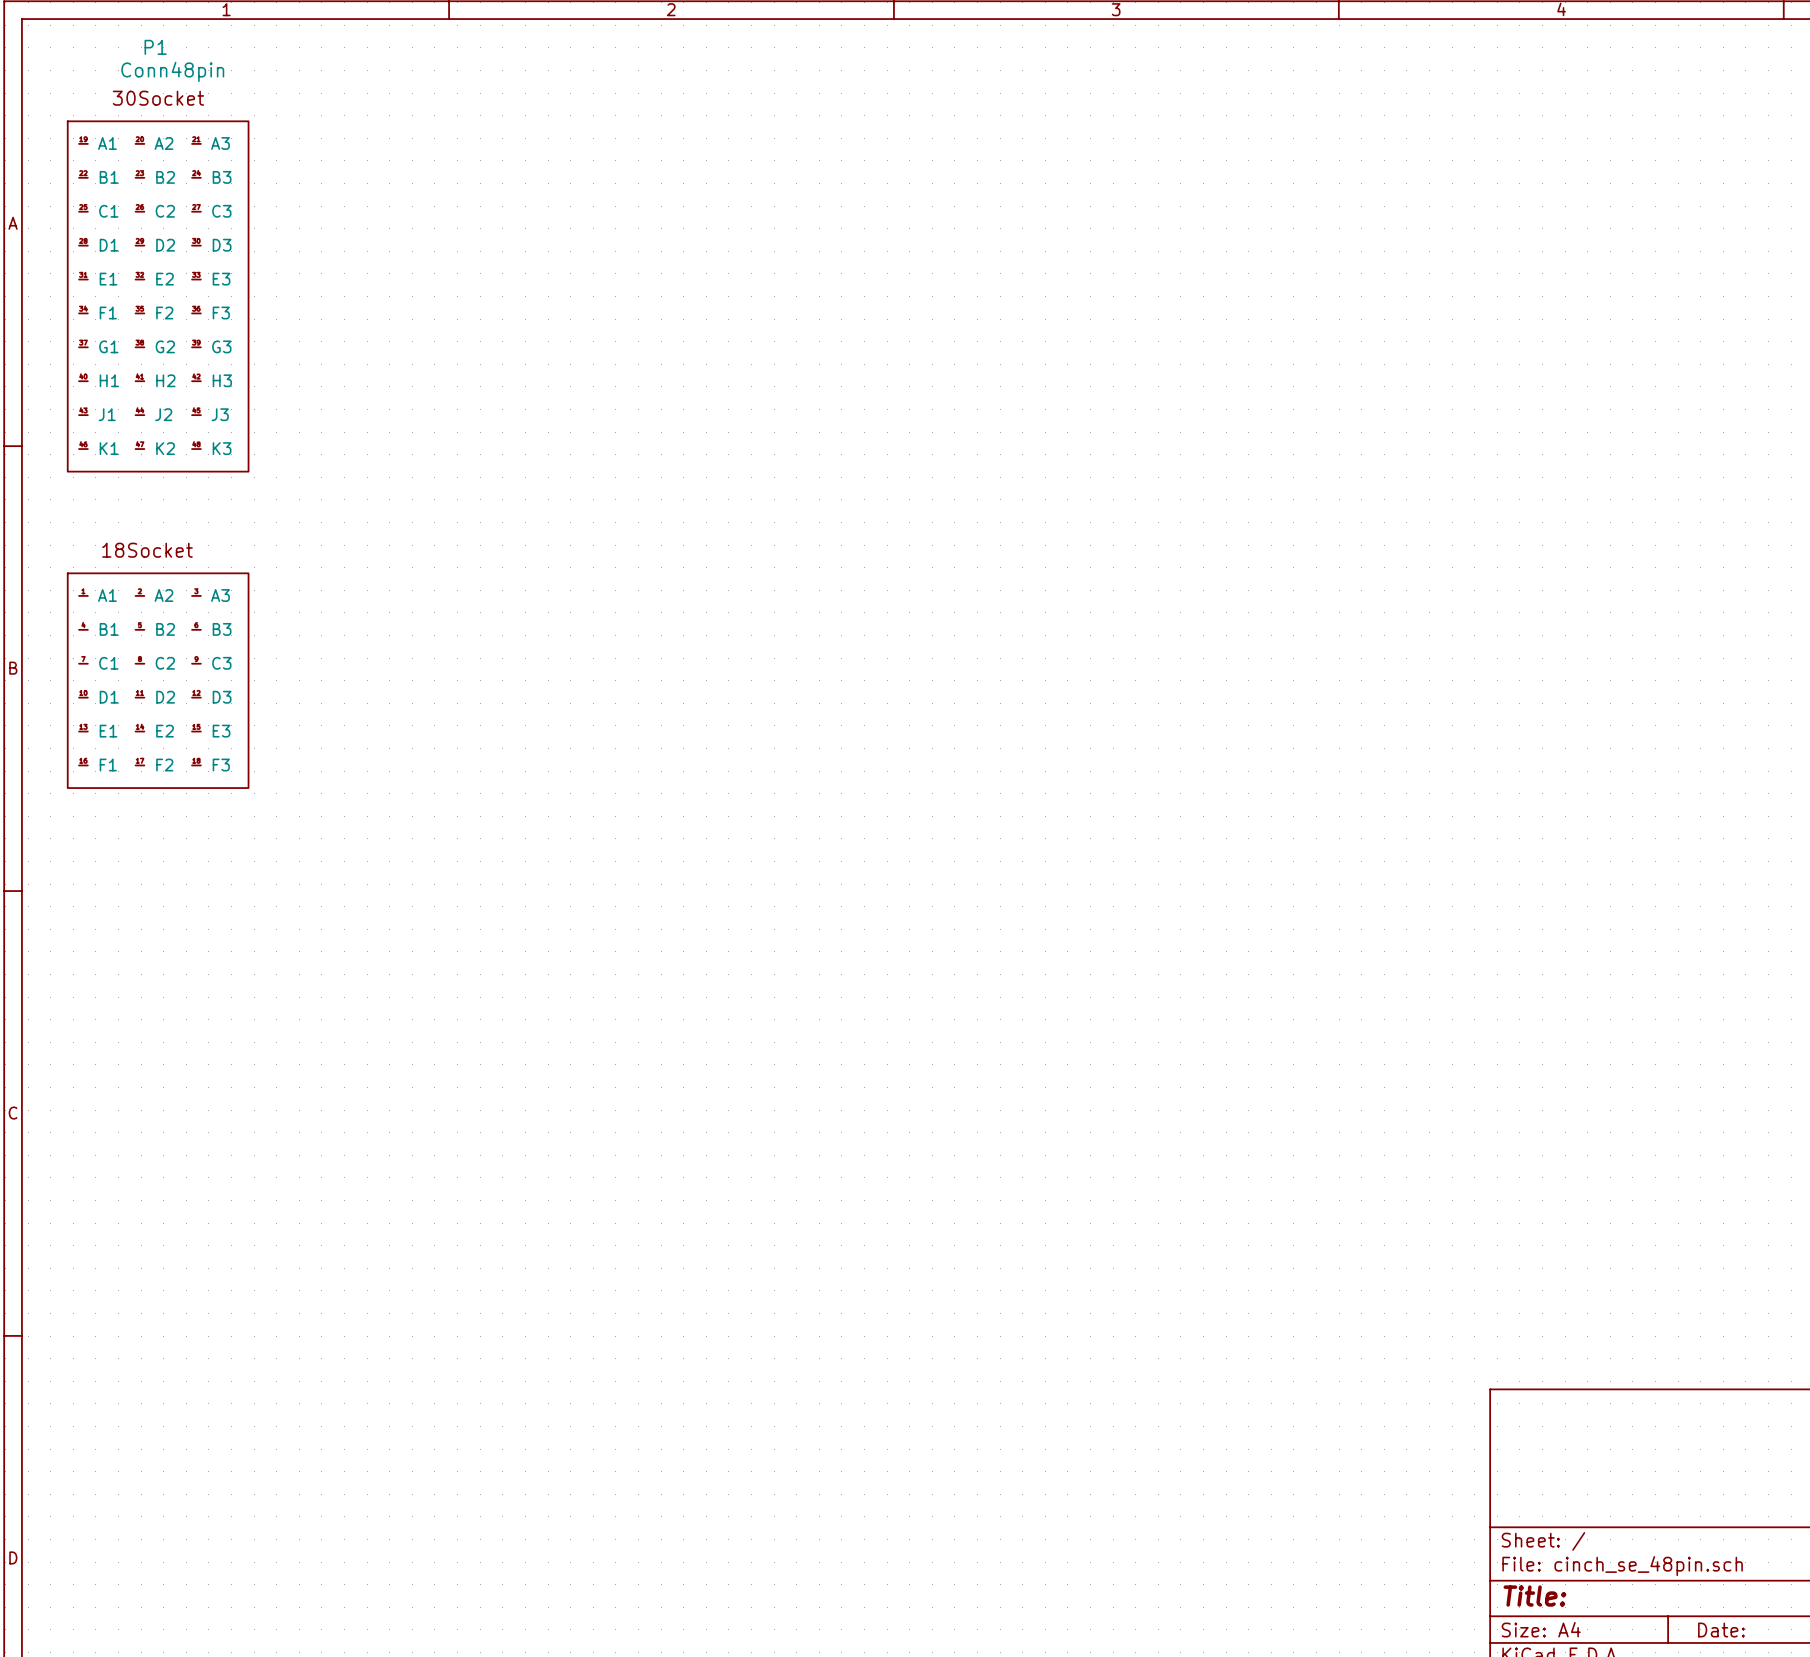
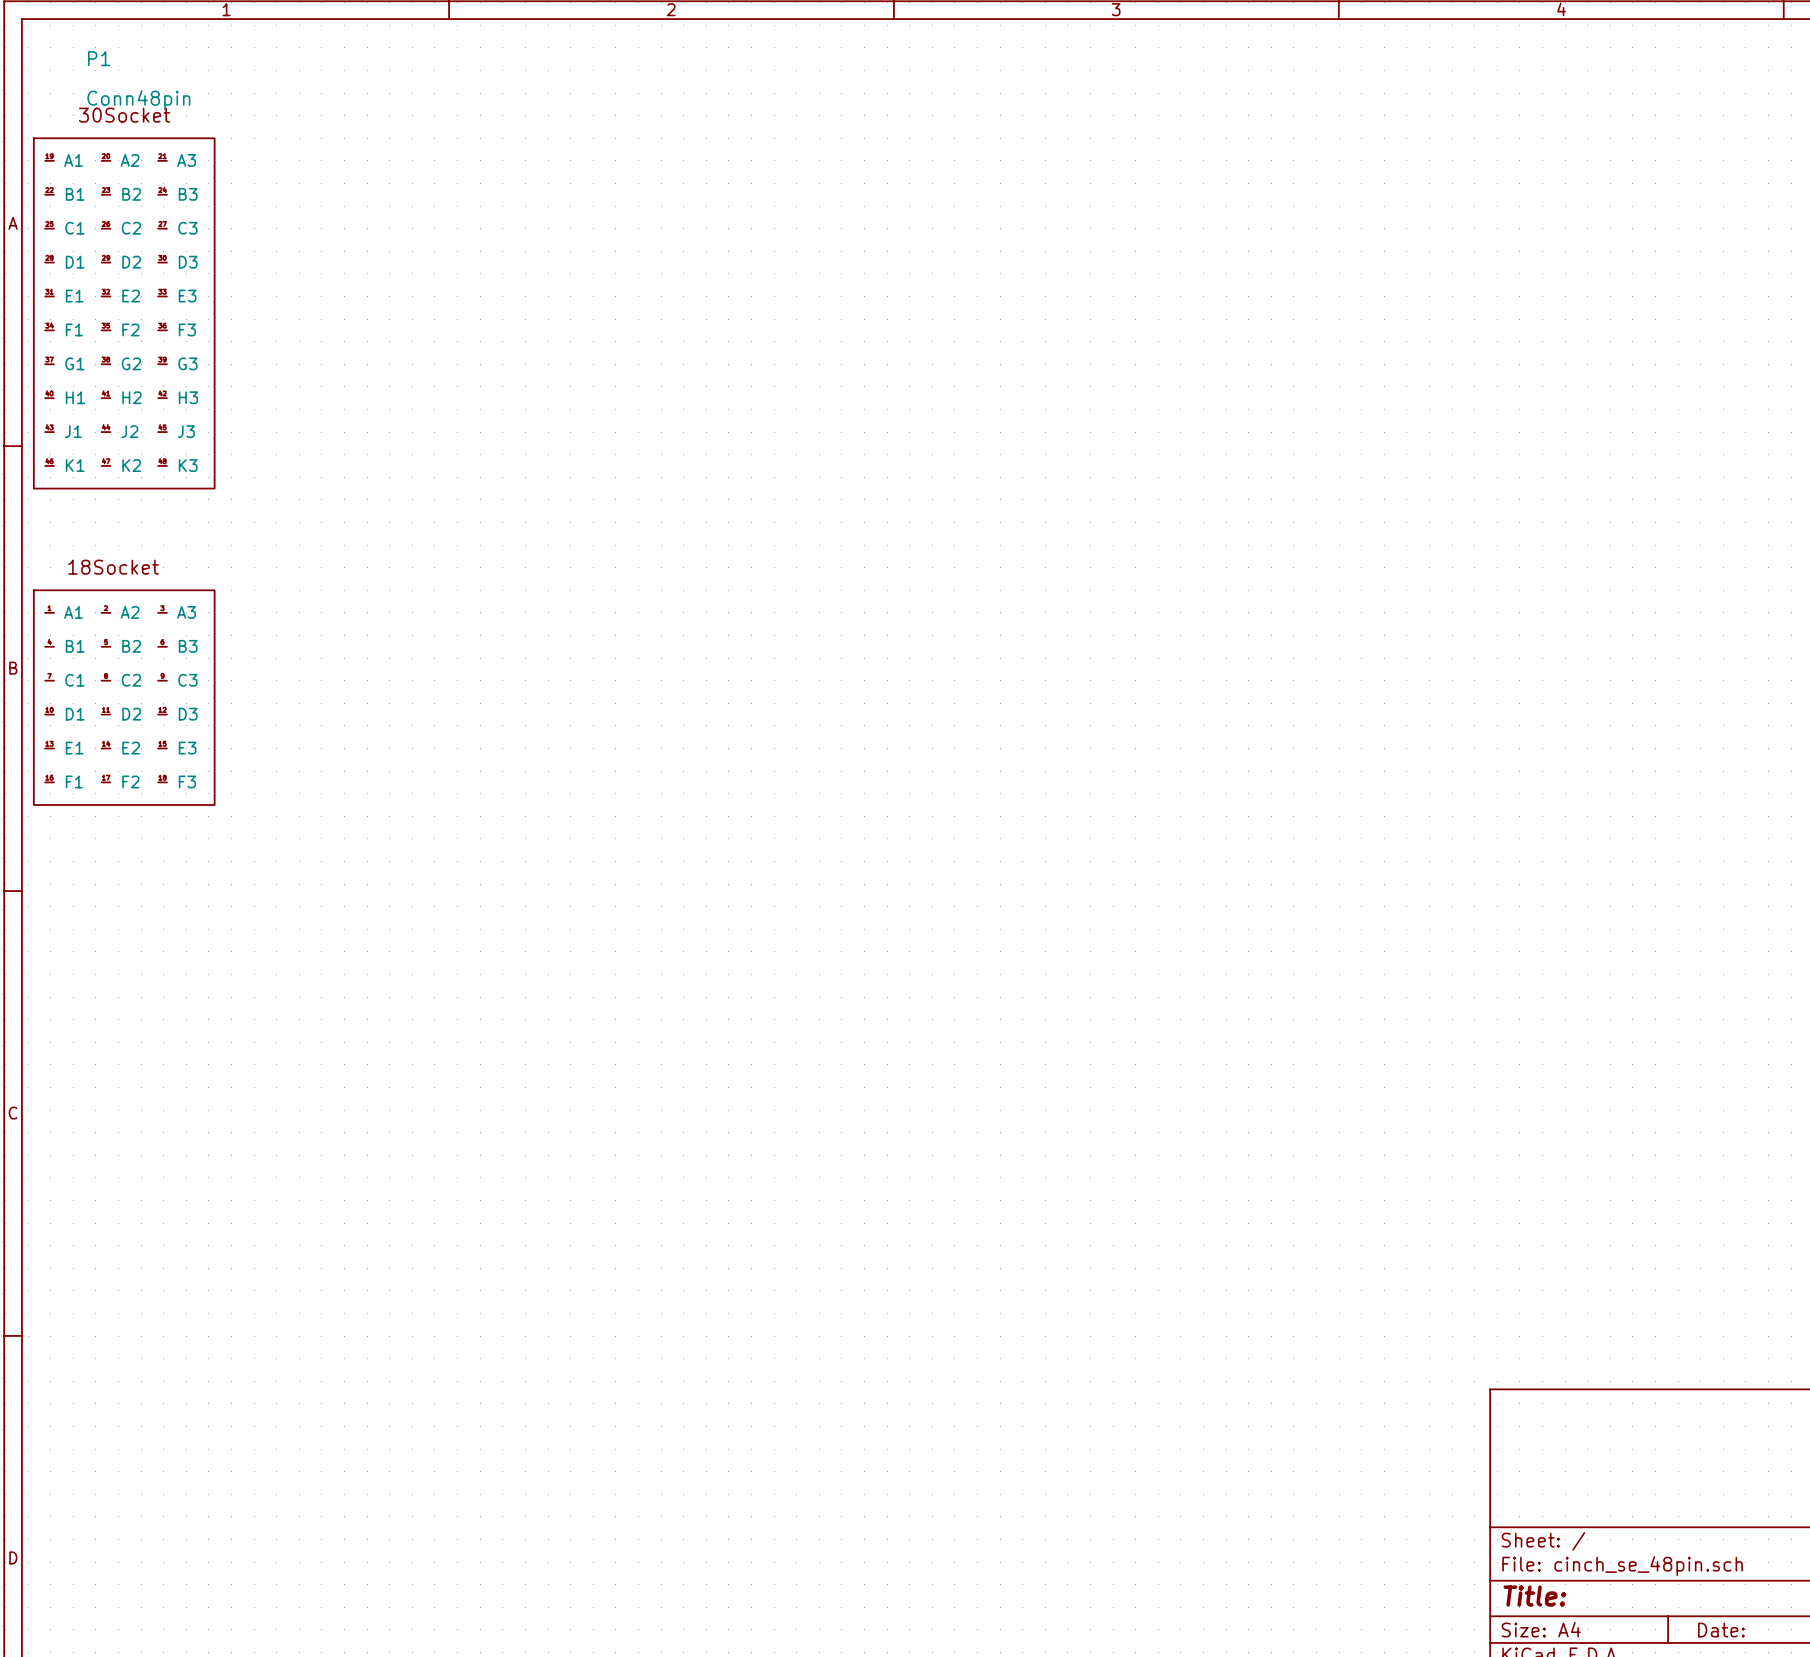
P1 name position: P1 (155, 47) -> P1 (99, 58)
P1 value position: Conn48pin (172, 71) -> Conn48pin (138, 100)
P1 position: (158, 454) -> (124, 471)

